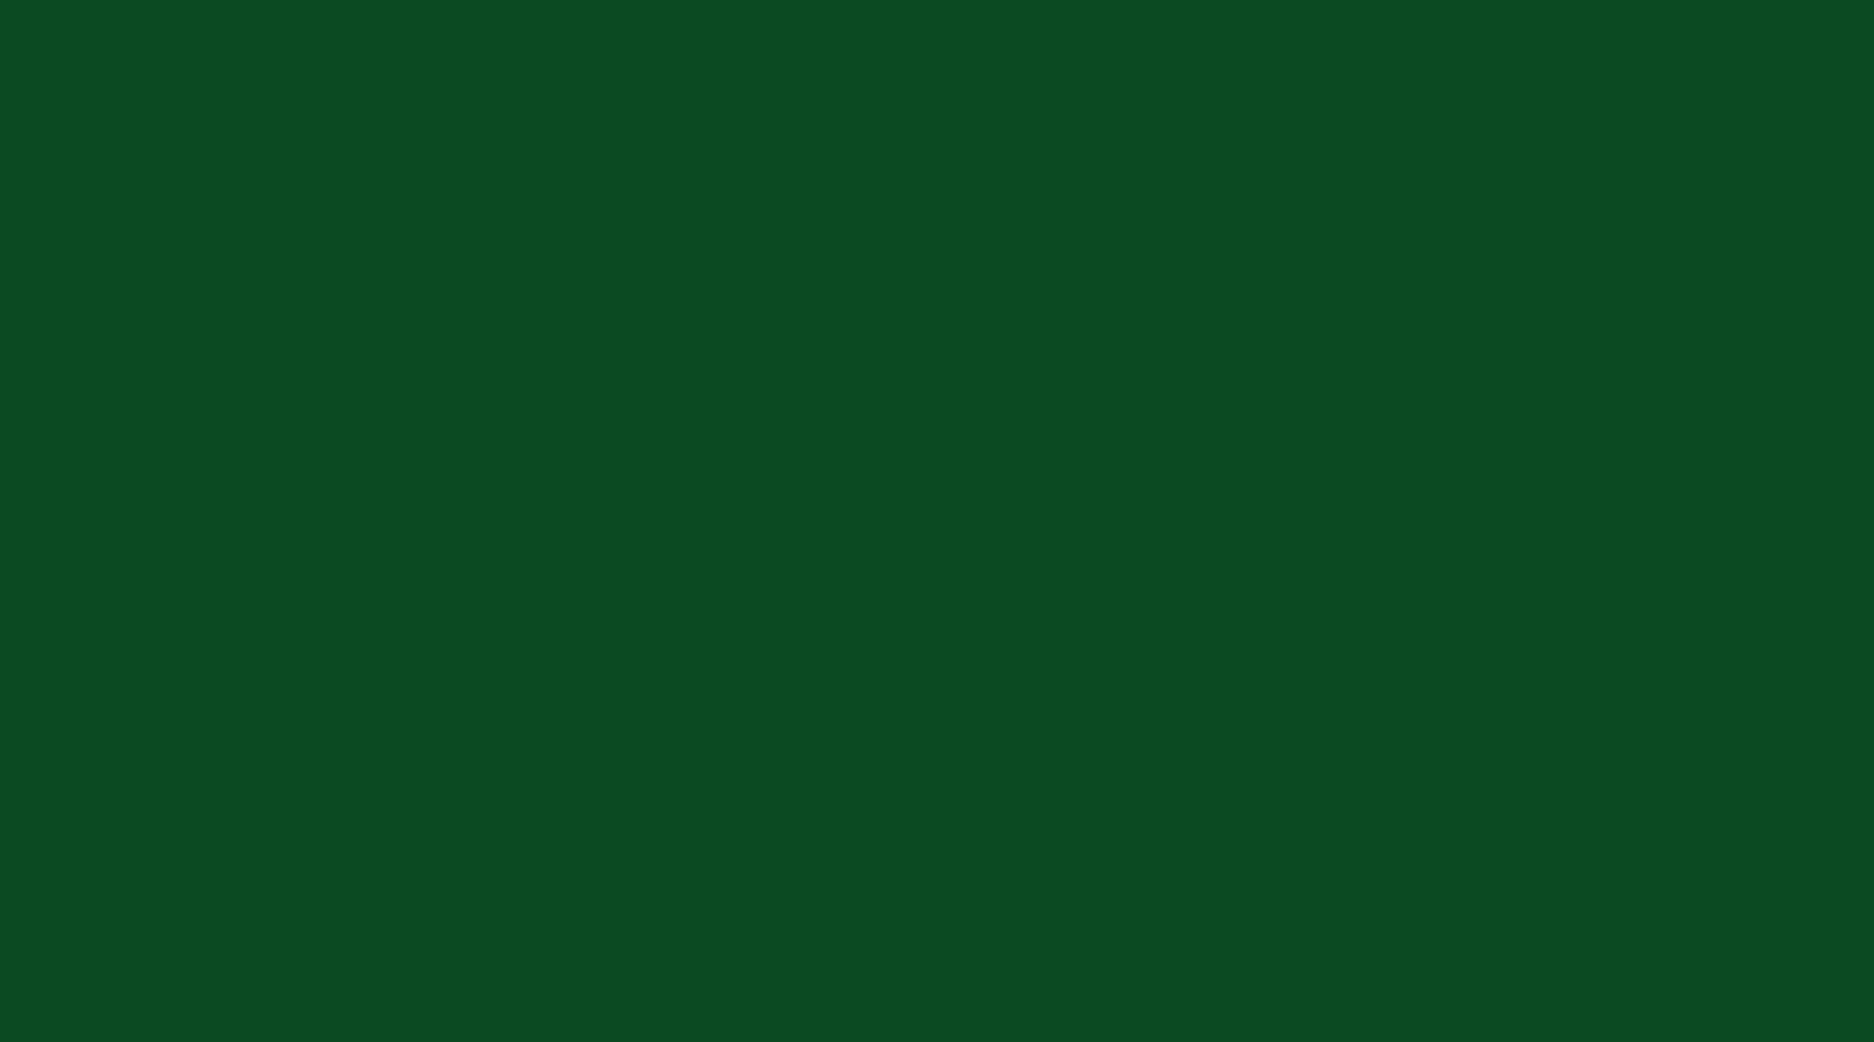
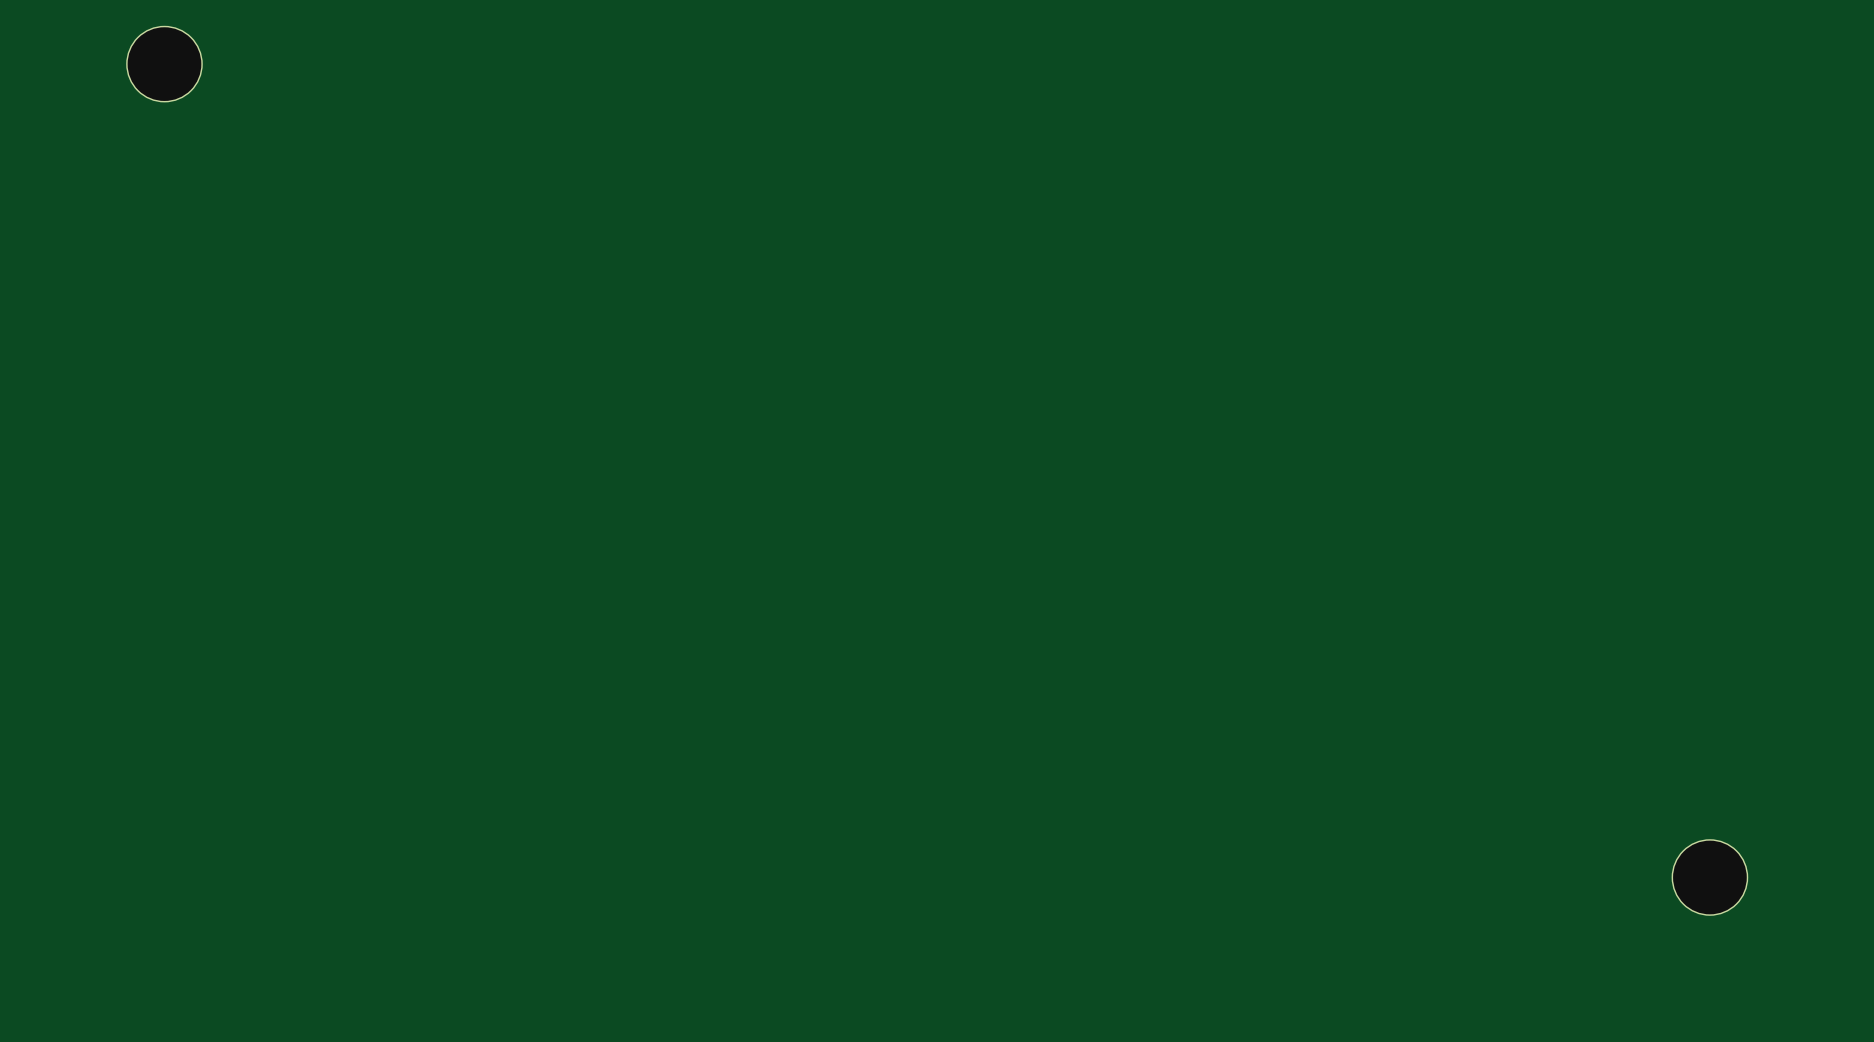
part: none -> (164, 64)
part: none -> (1709, 877)

